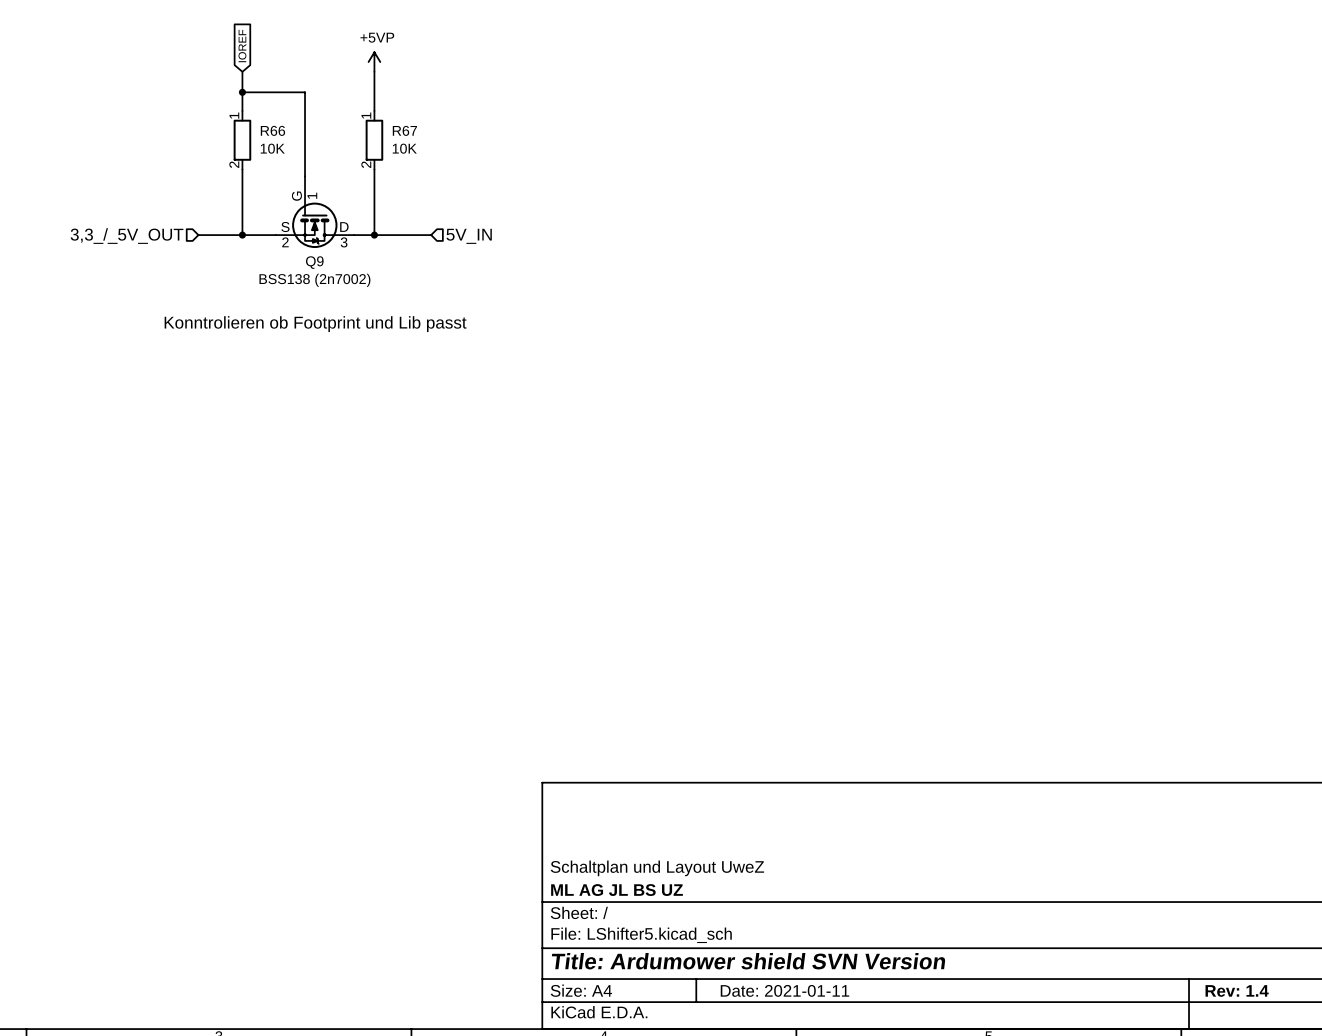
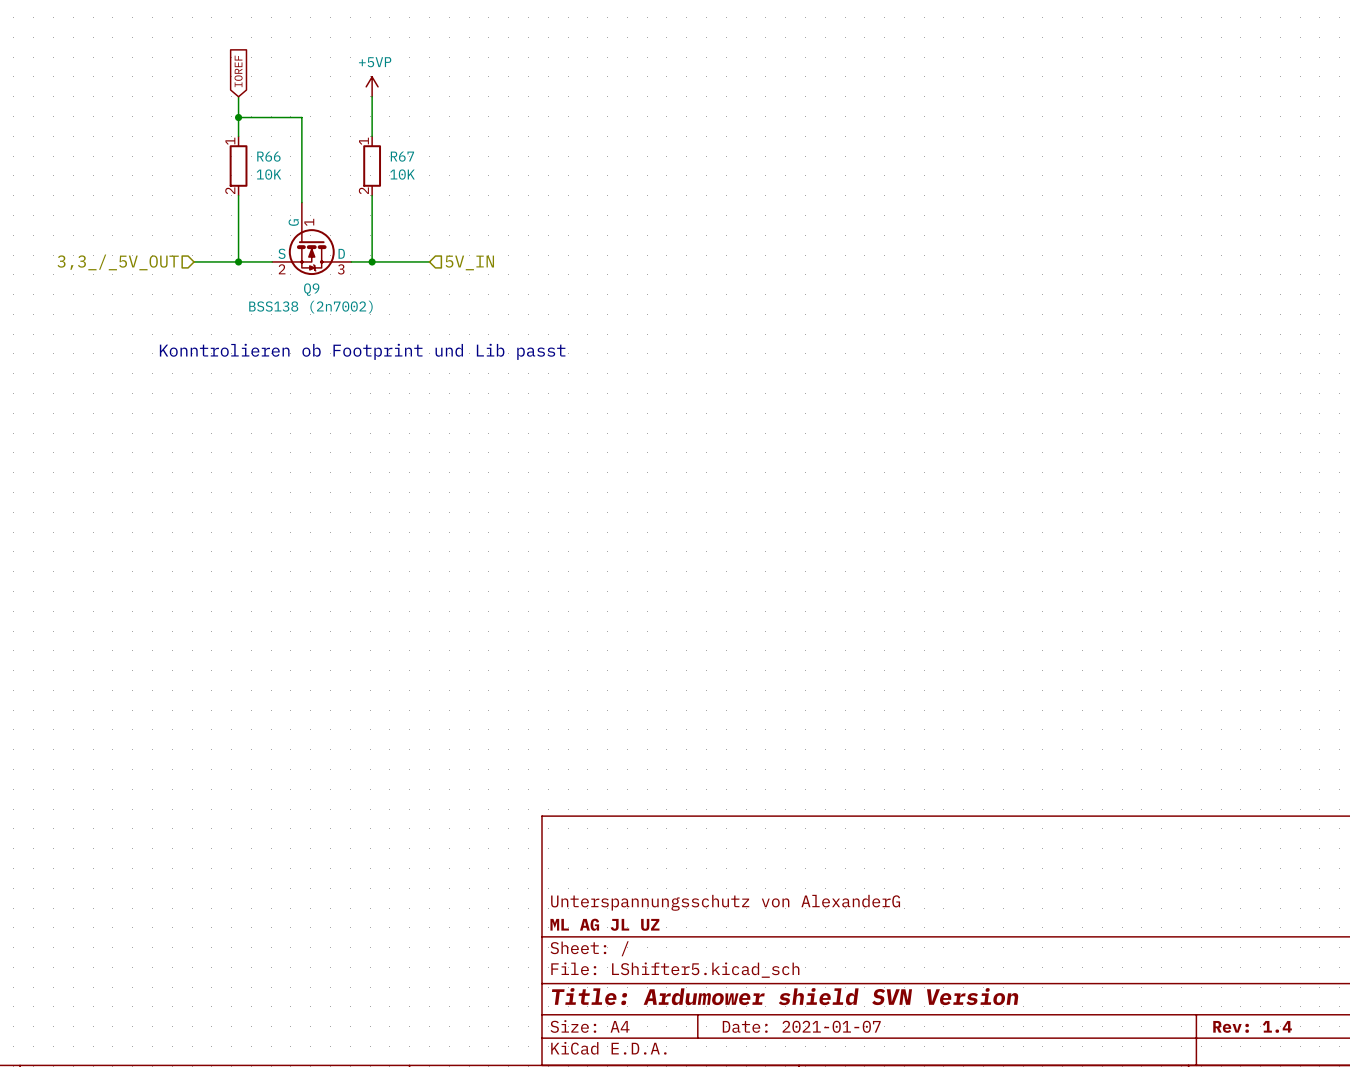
title block: Schaltplan und Layout UweZ (657, 868) -> Unterspannungsschutz von AlexanderG (725, 902)
title block: ML AG JL BS UZ (617, 890) -> ML AG JL UZ (604, 924)
title block: Date: 2021-01-11 (784, 990) -> Date: 2021-01-07 (801, 1026)

